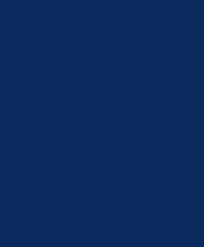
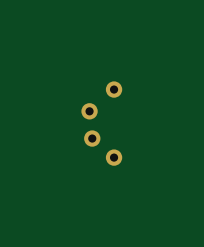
via: none -> (114, 89)
via: none -> (89, 111)
via: none -> (92, 138)
via: none -> (114, 157)

